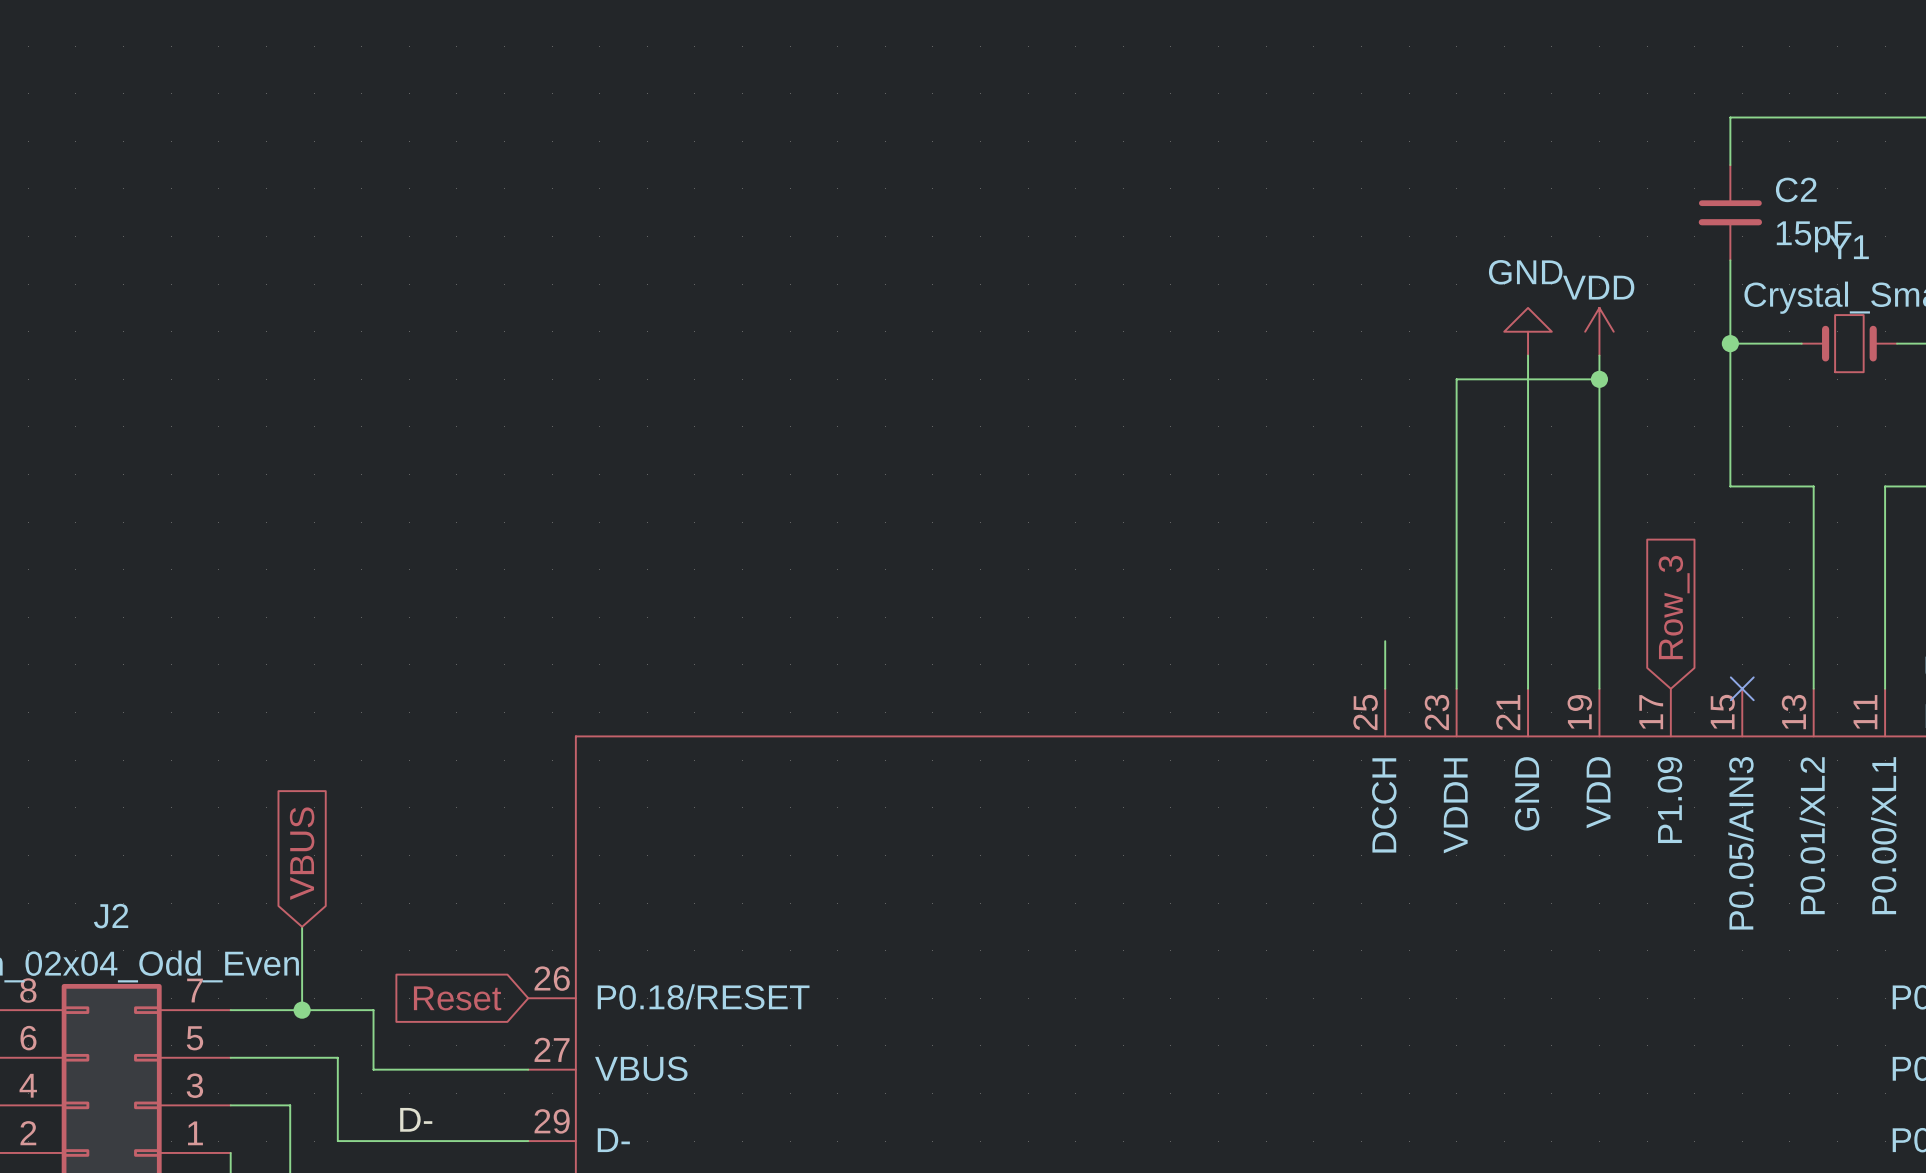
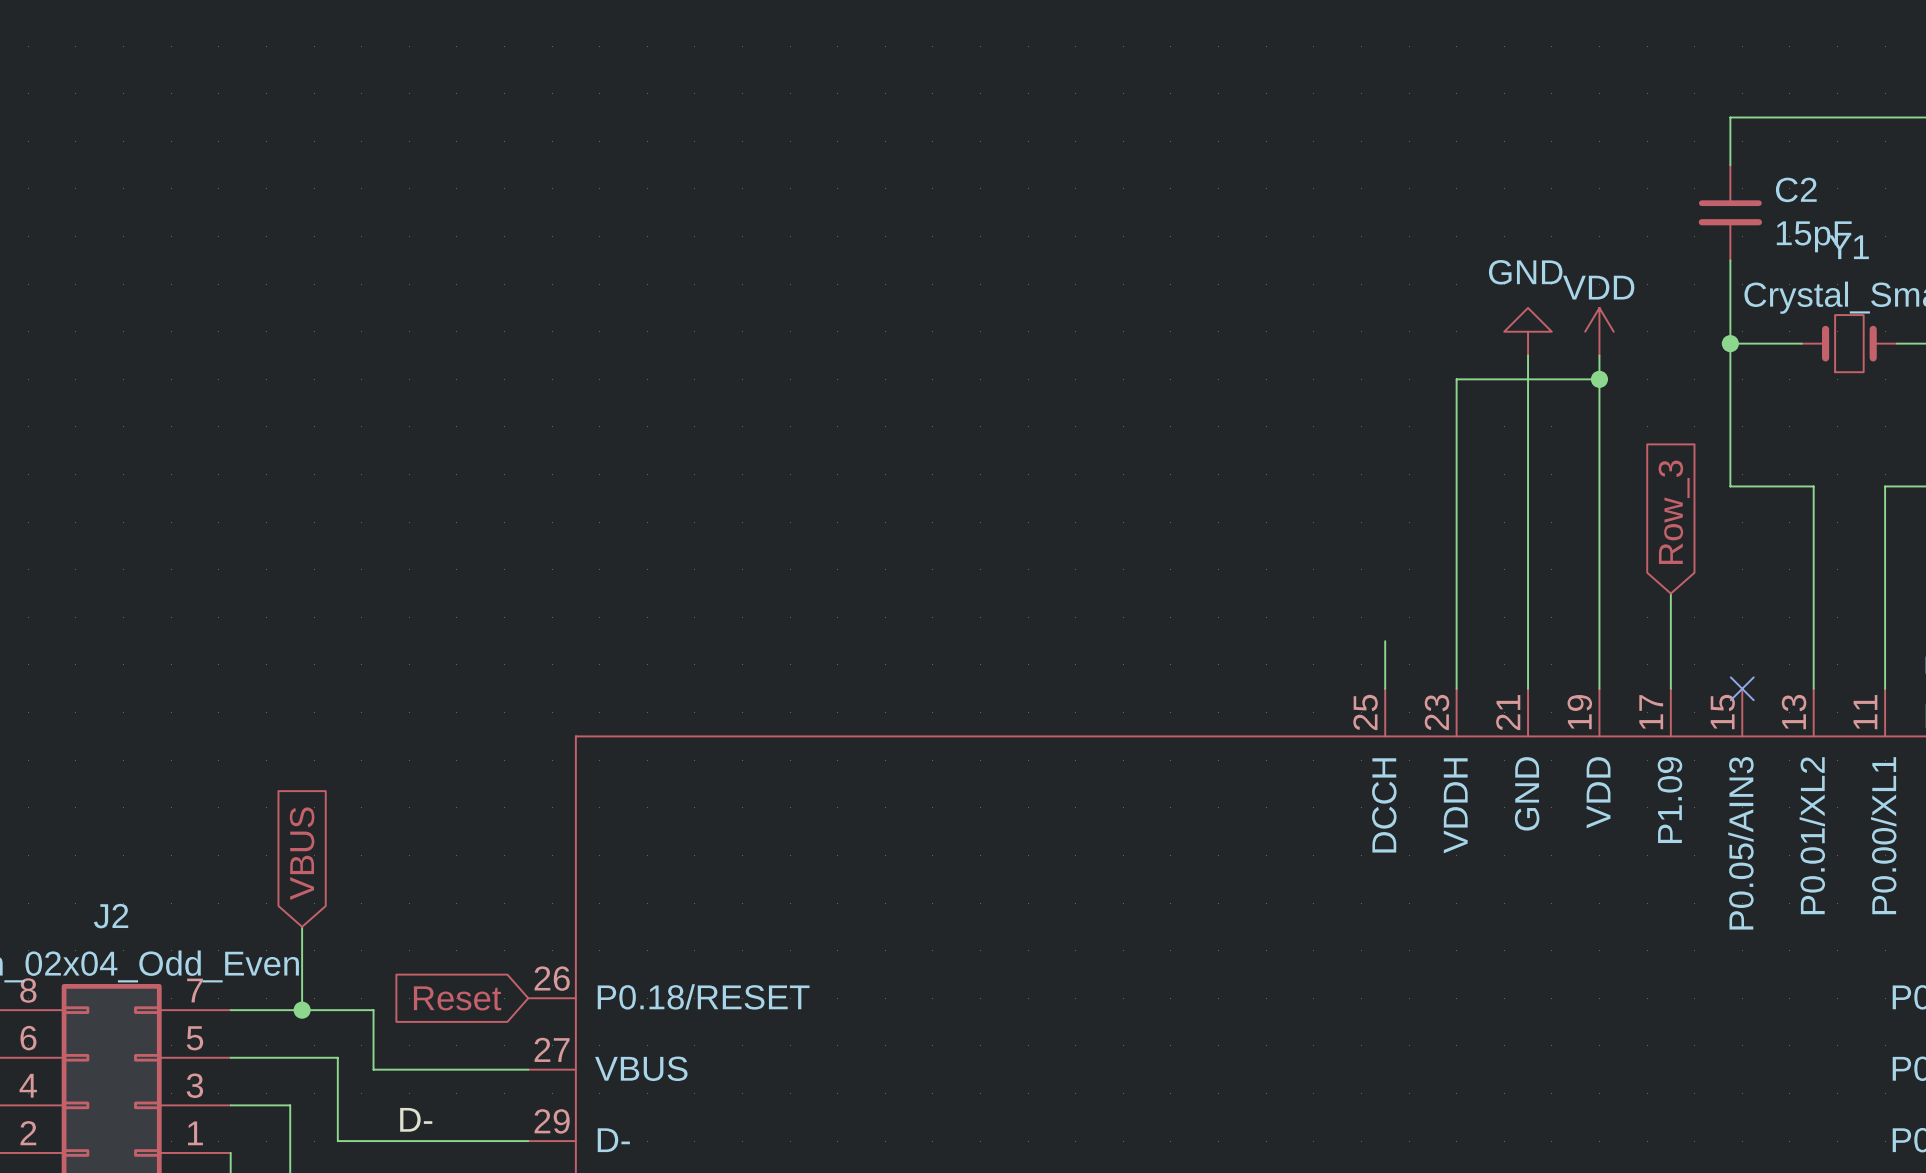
wire: none -> (1670, 593) (1670, 688)
global label position: Row_3 (1674, 607) -> Row_3 (1674, 512)

